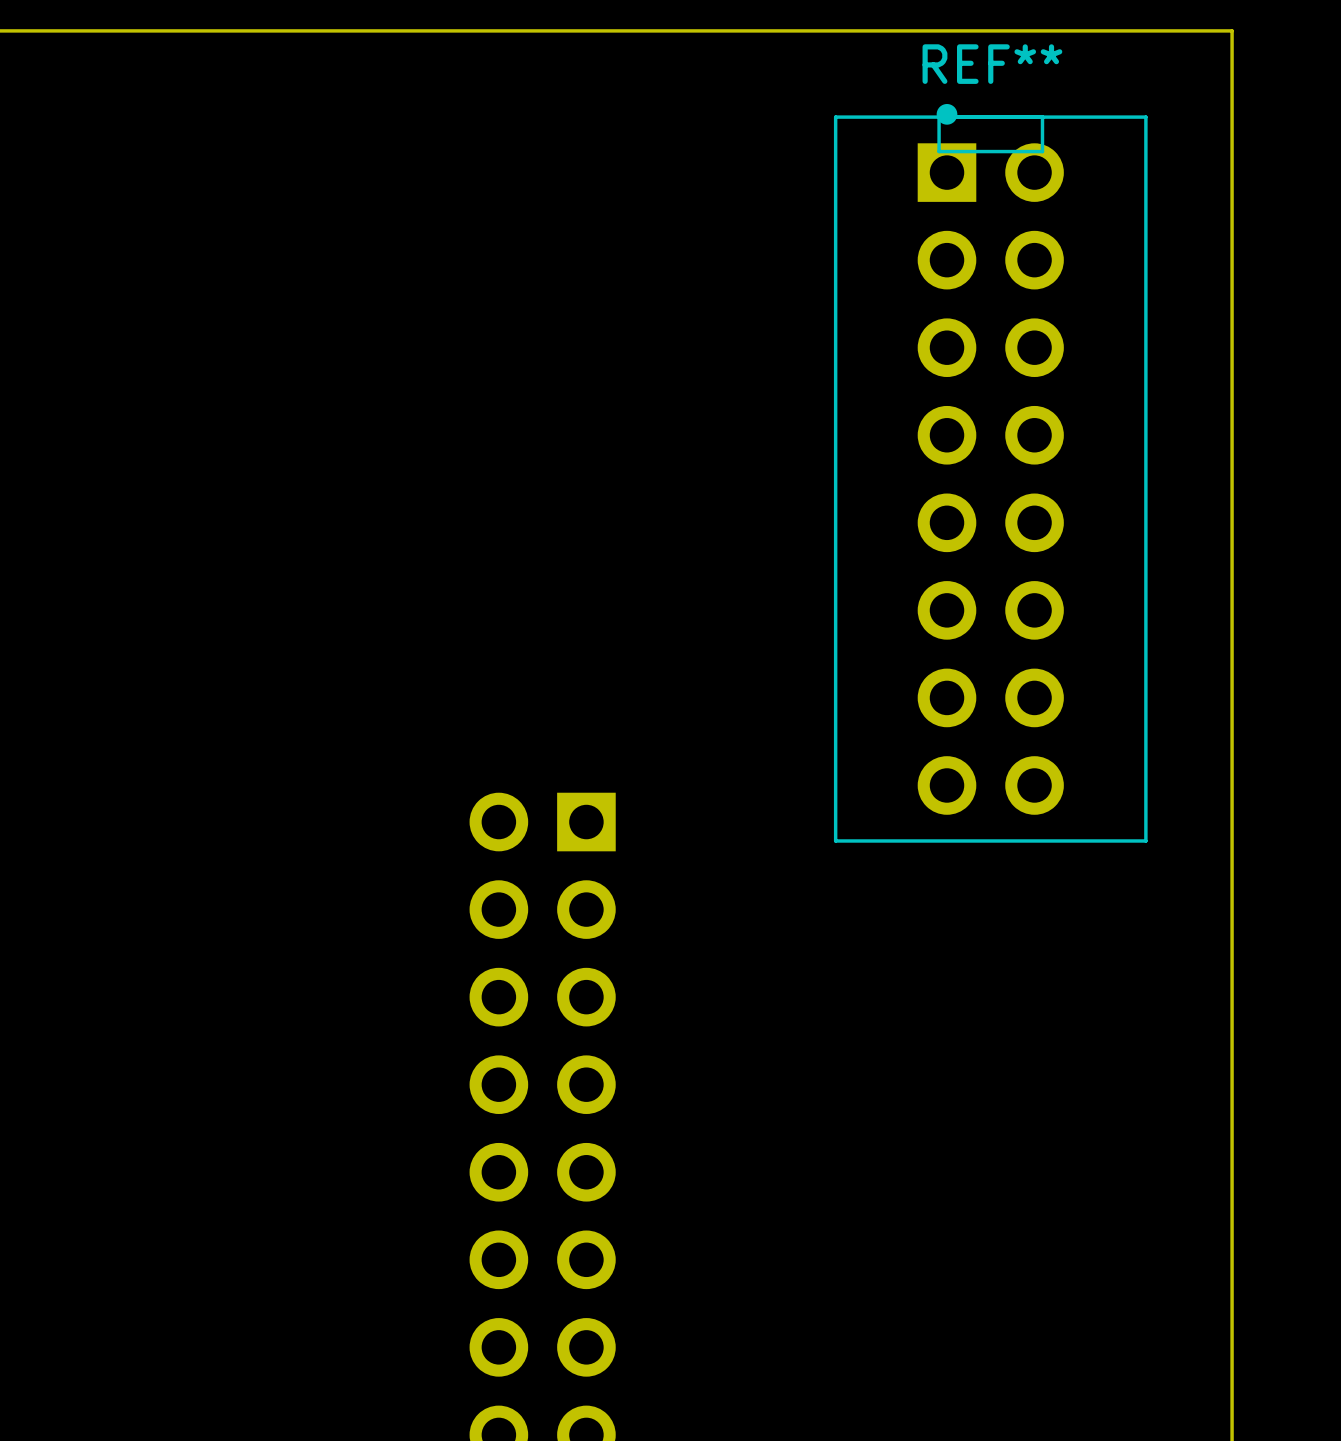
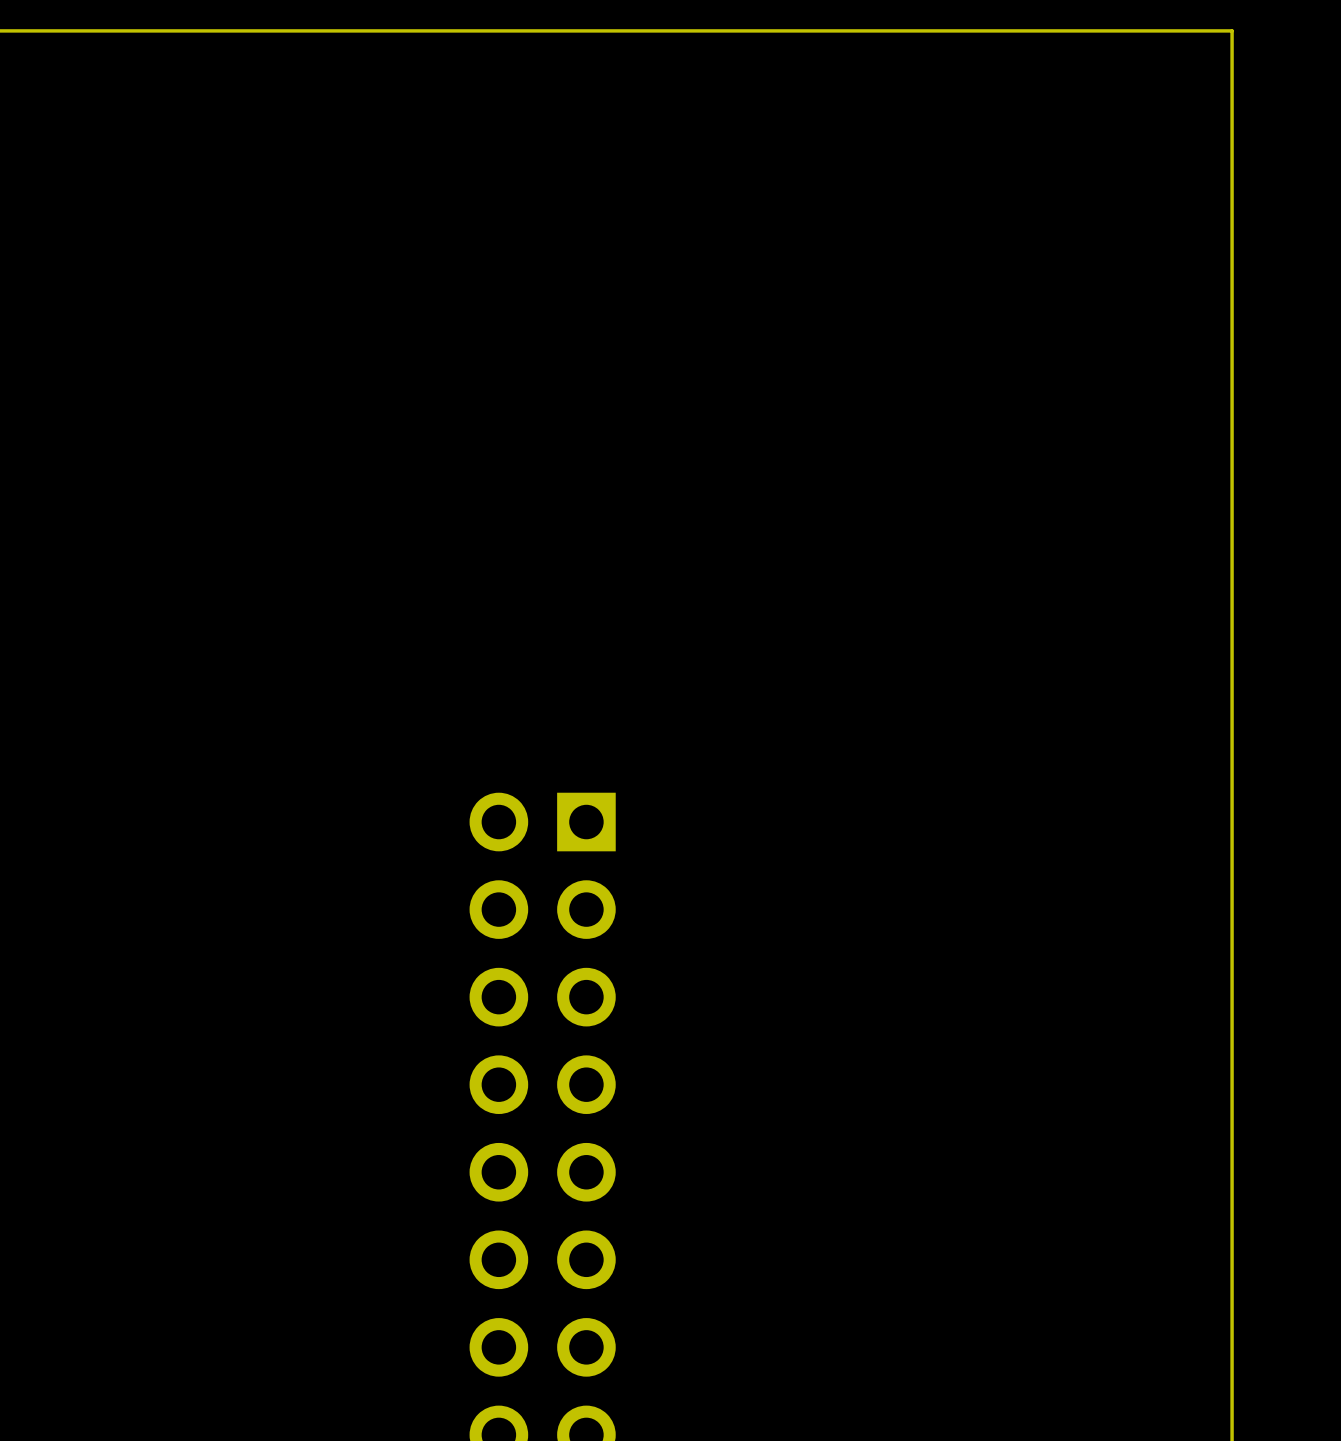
REF**: (990, 473) -> none

